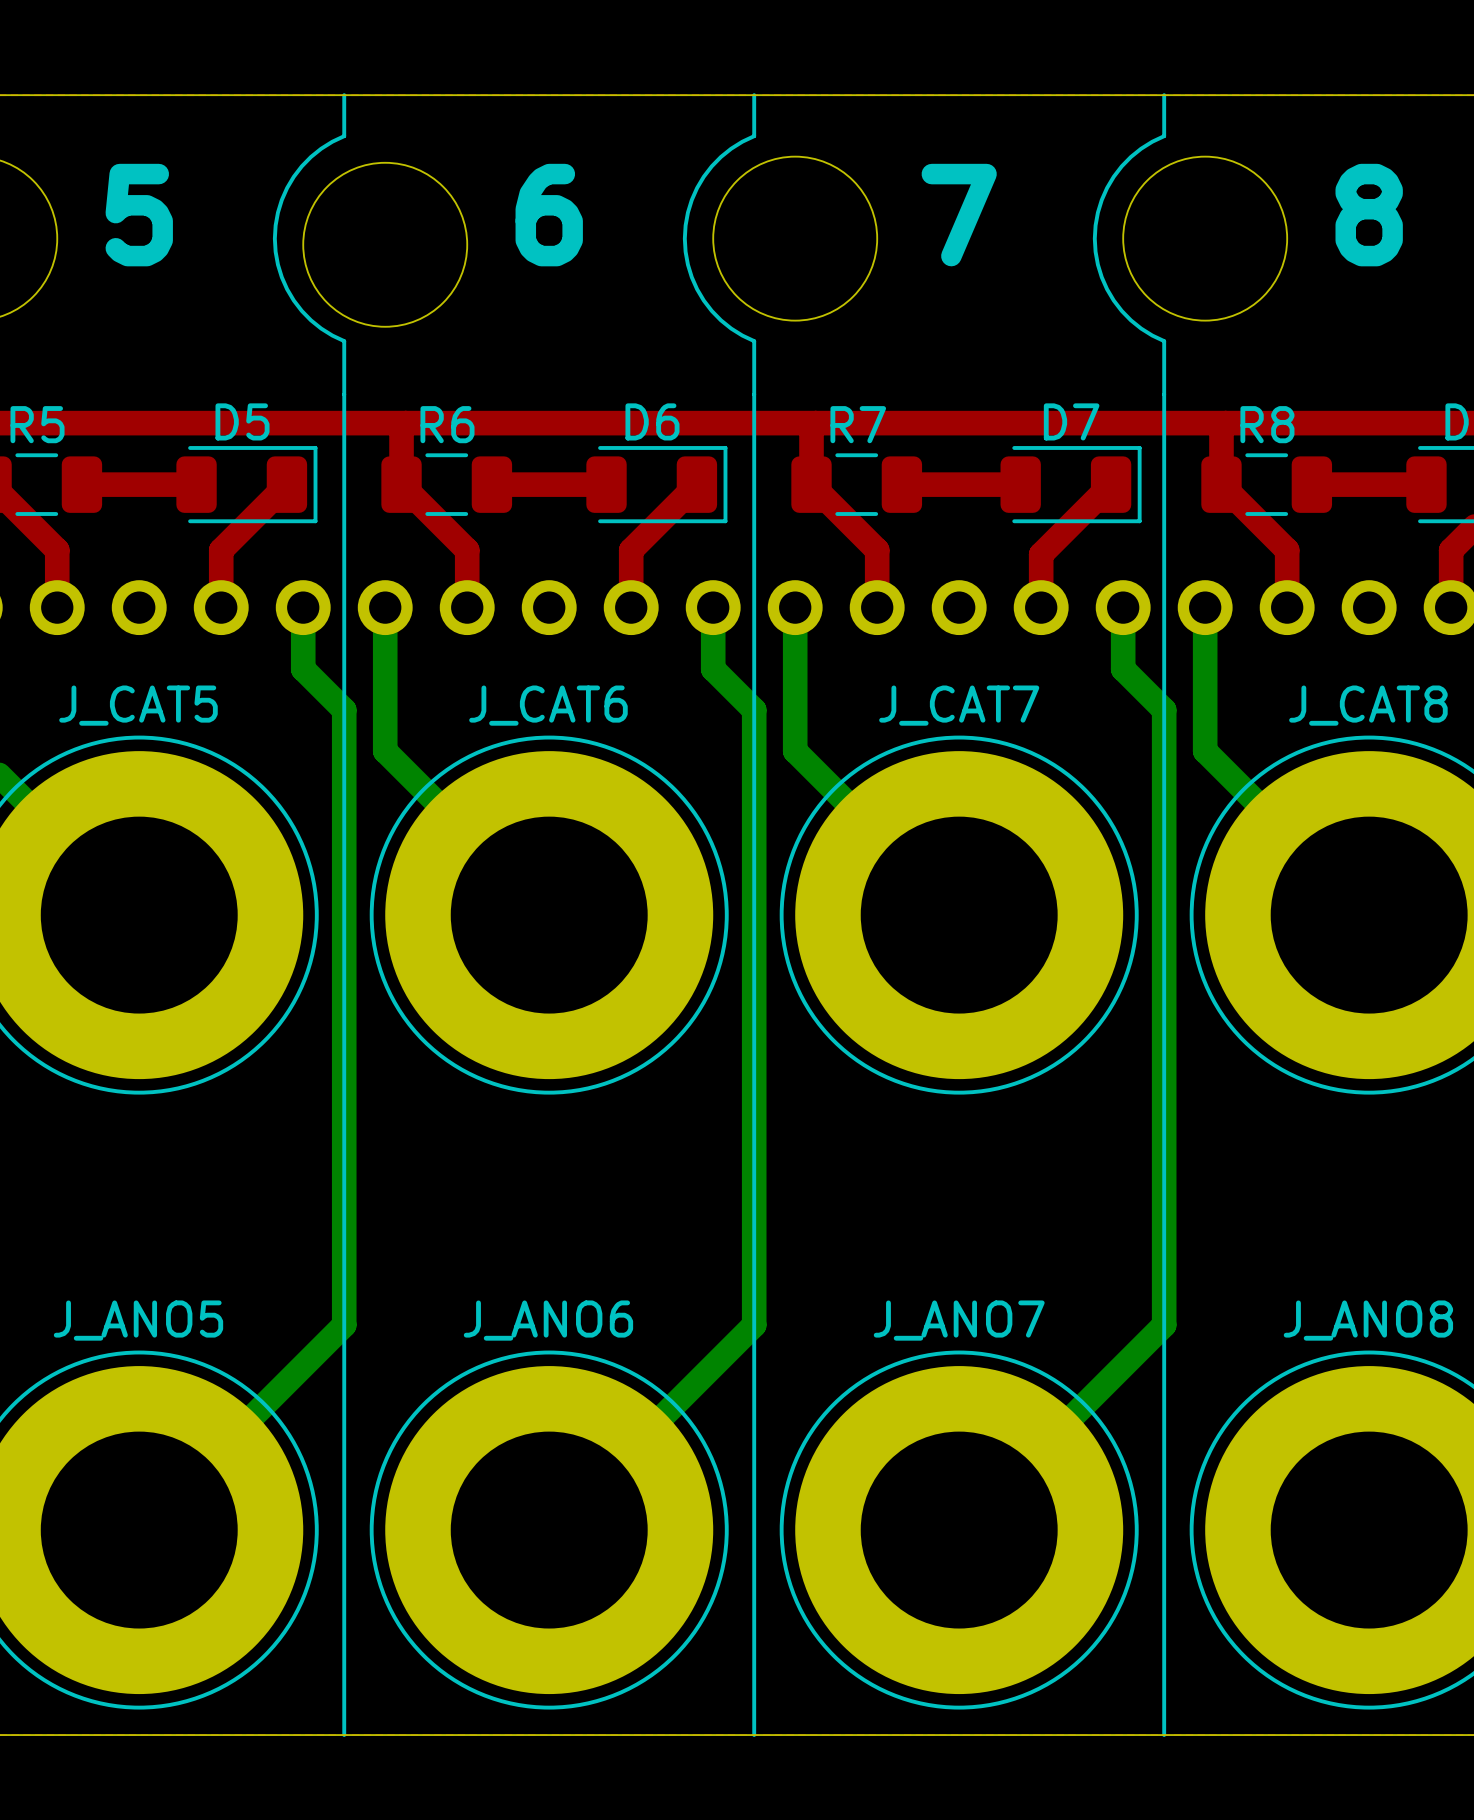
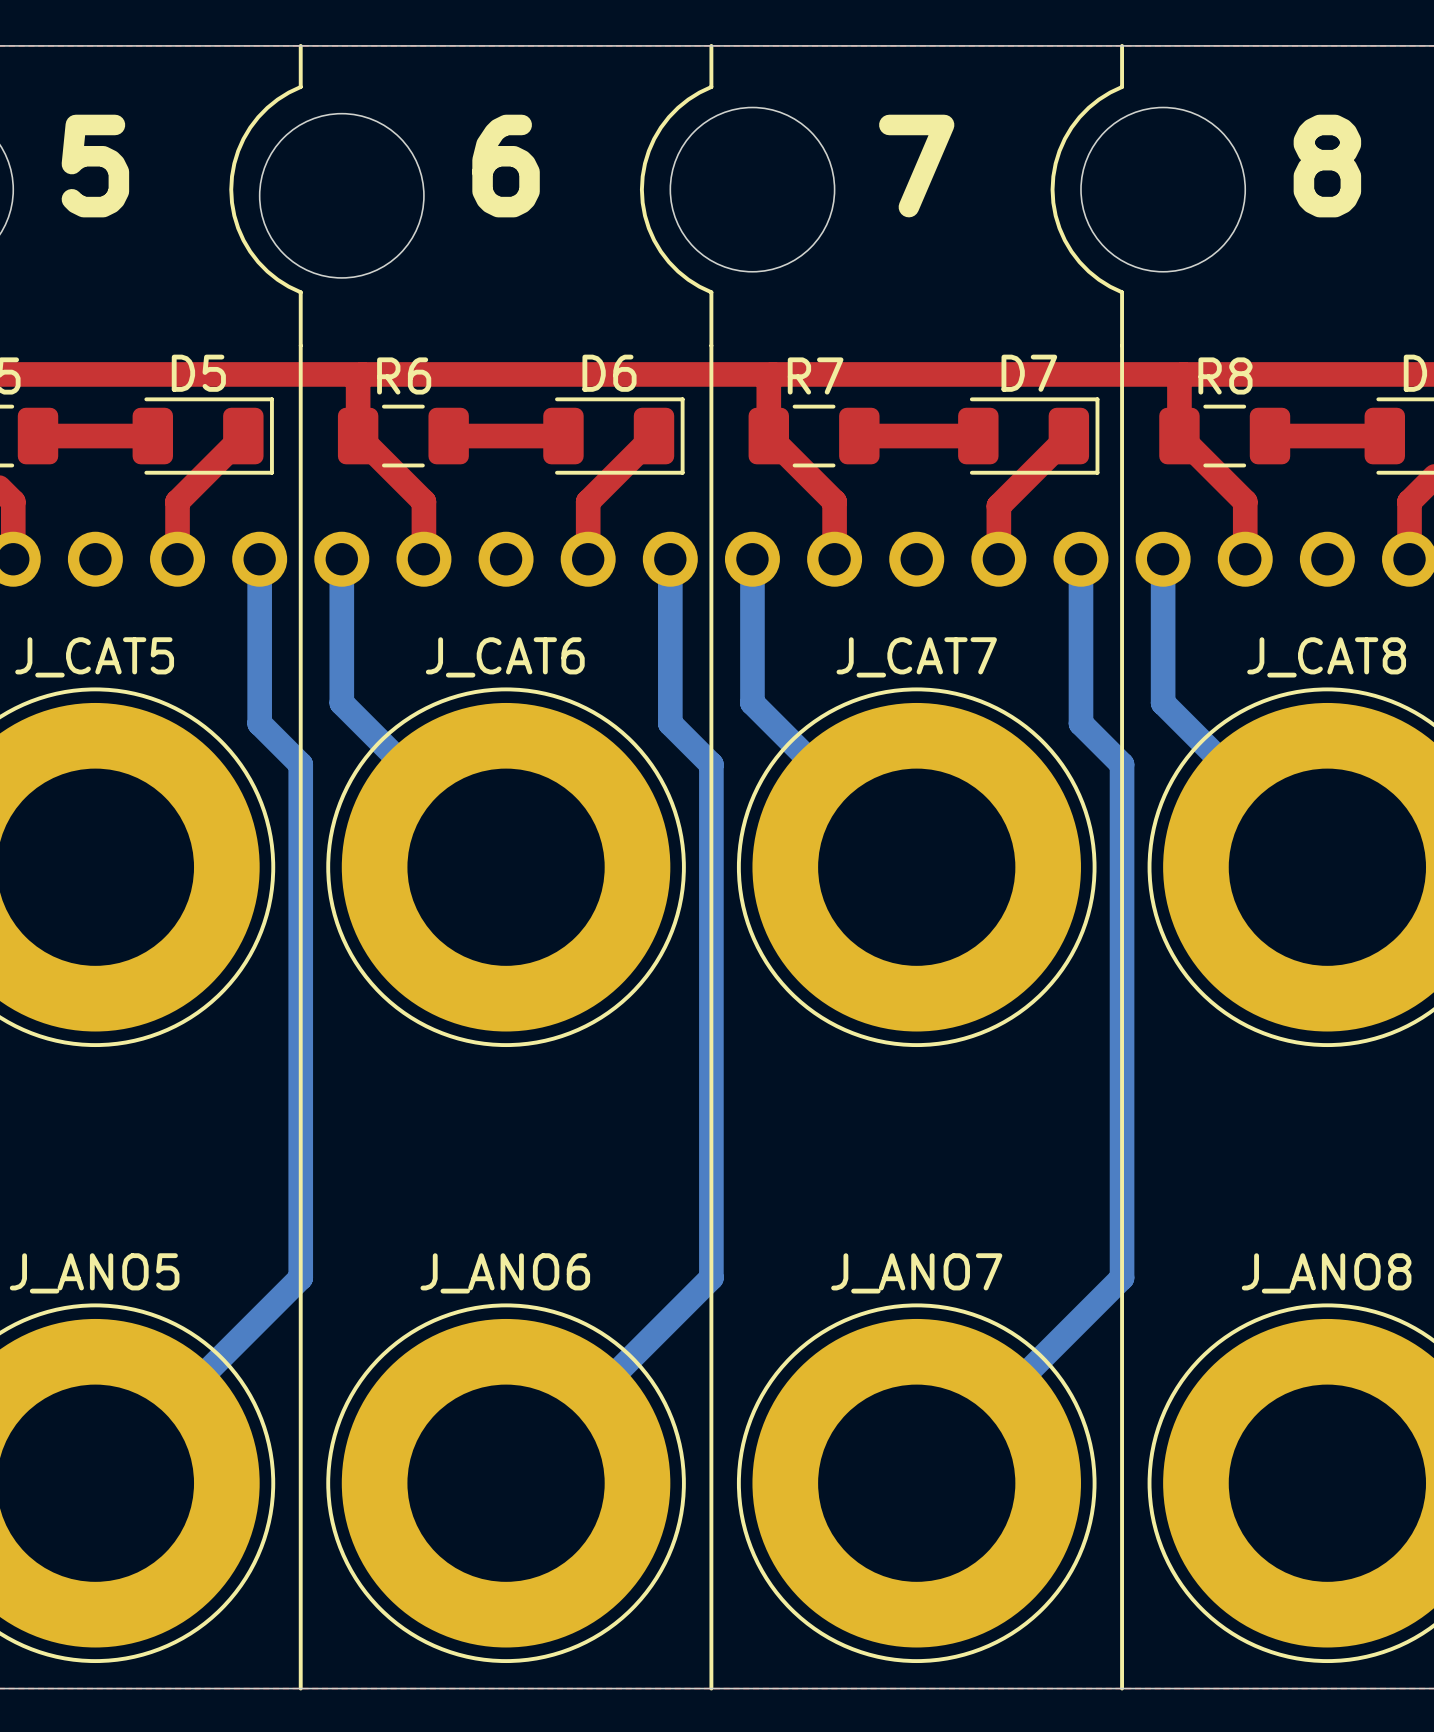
bottom track: (303, 669) (344, 710) (344, 812) -> (259, 620) (259, 723) (300, 764)
bottom track: (713, 669) (754, 710) (754, 812) -> (670, 620) (670, 723) (711, 764)
bottom track: (1123, 669) (1164, 710) (1164, 812) -> (1080, 620) (1080, 723) (1122, 764)

